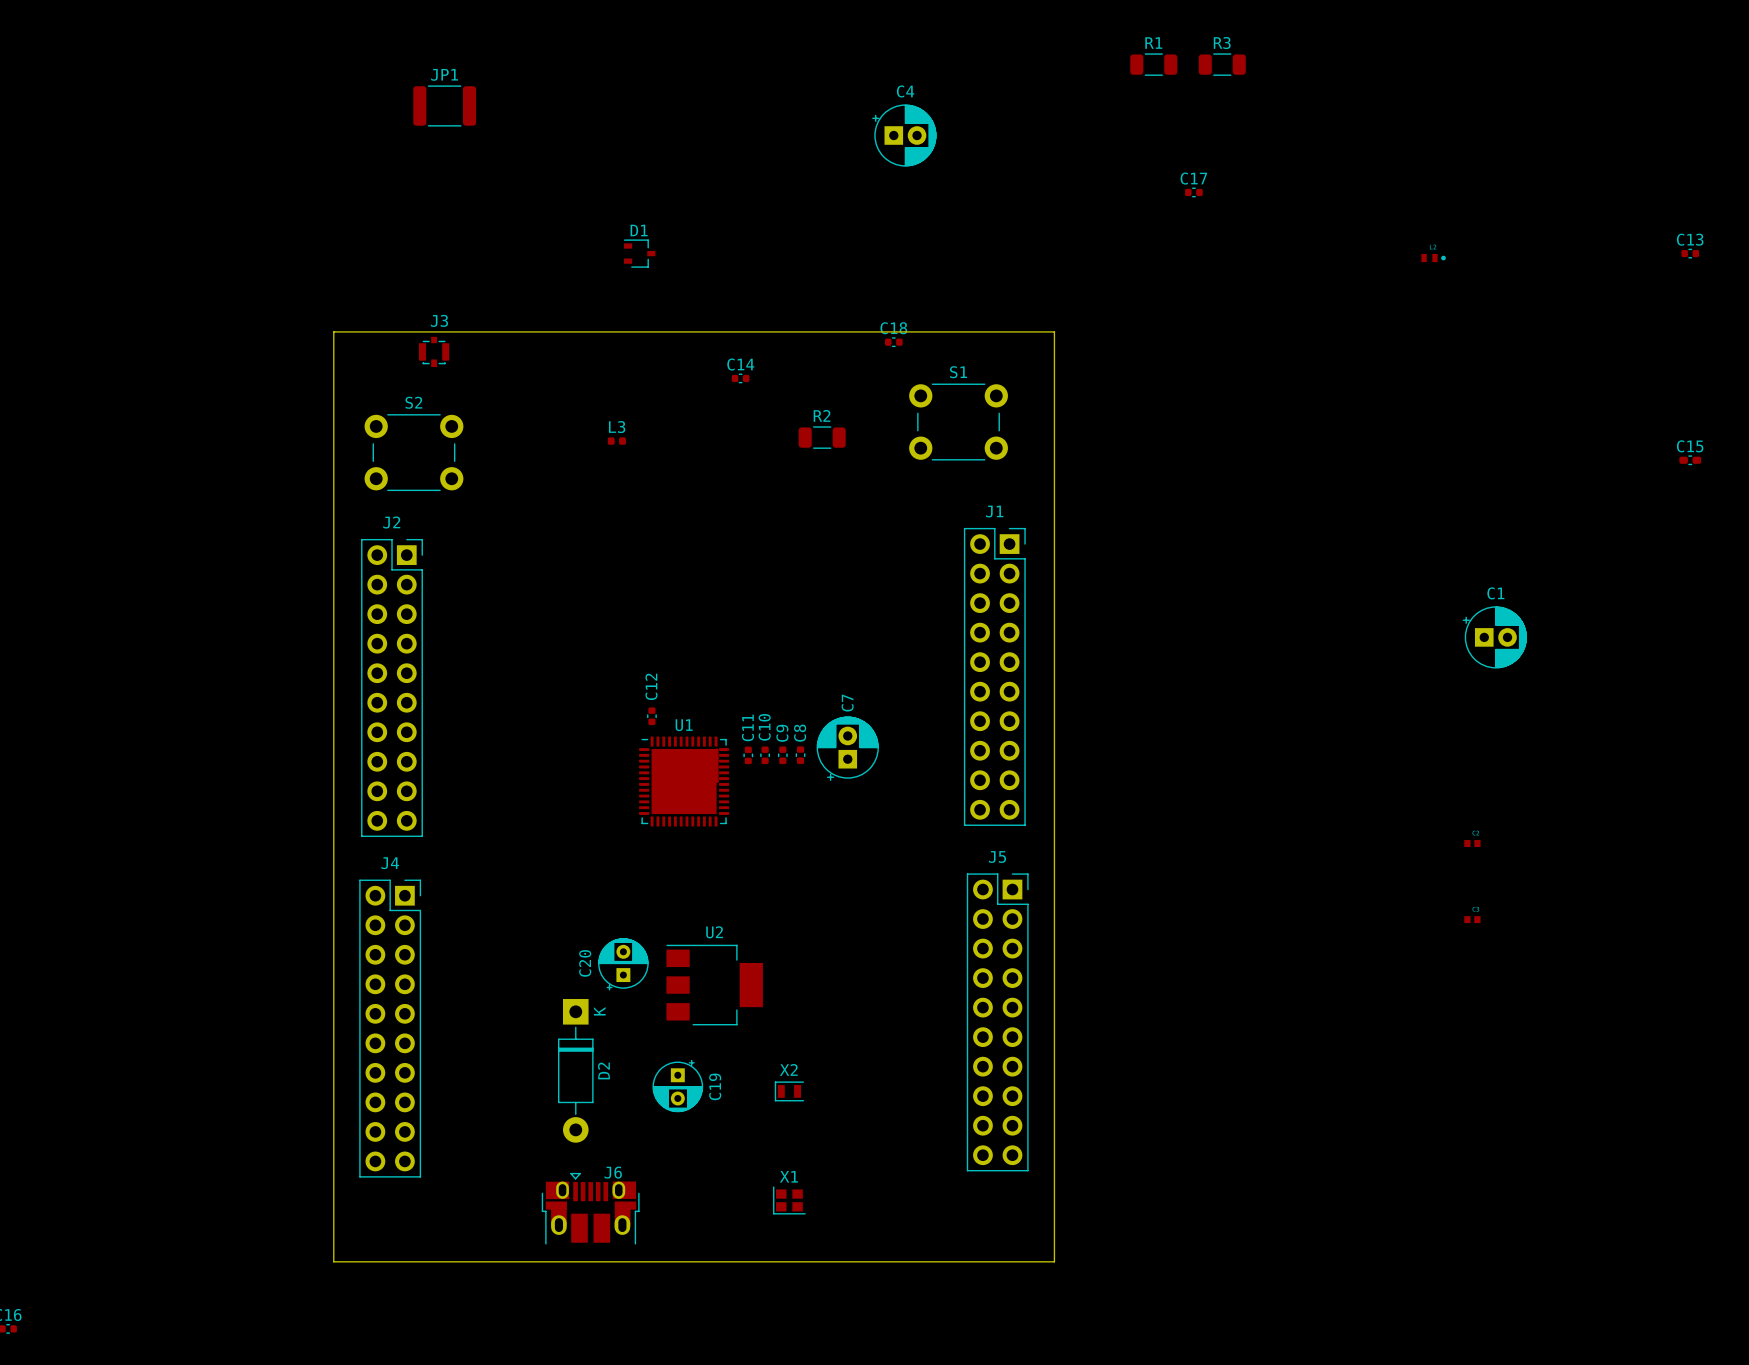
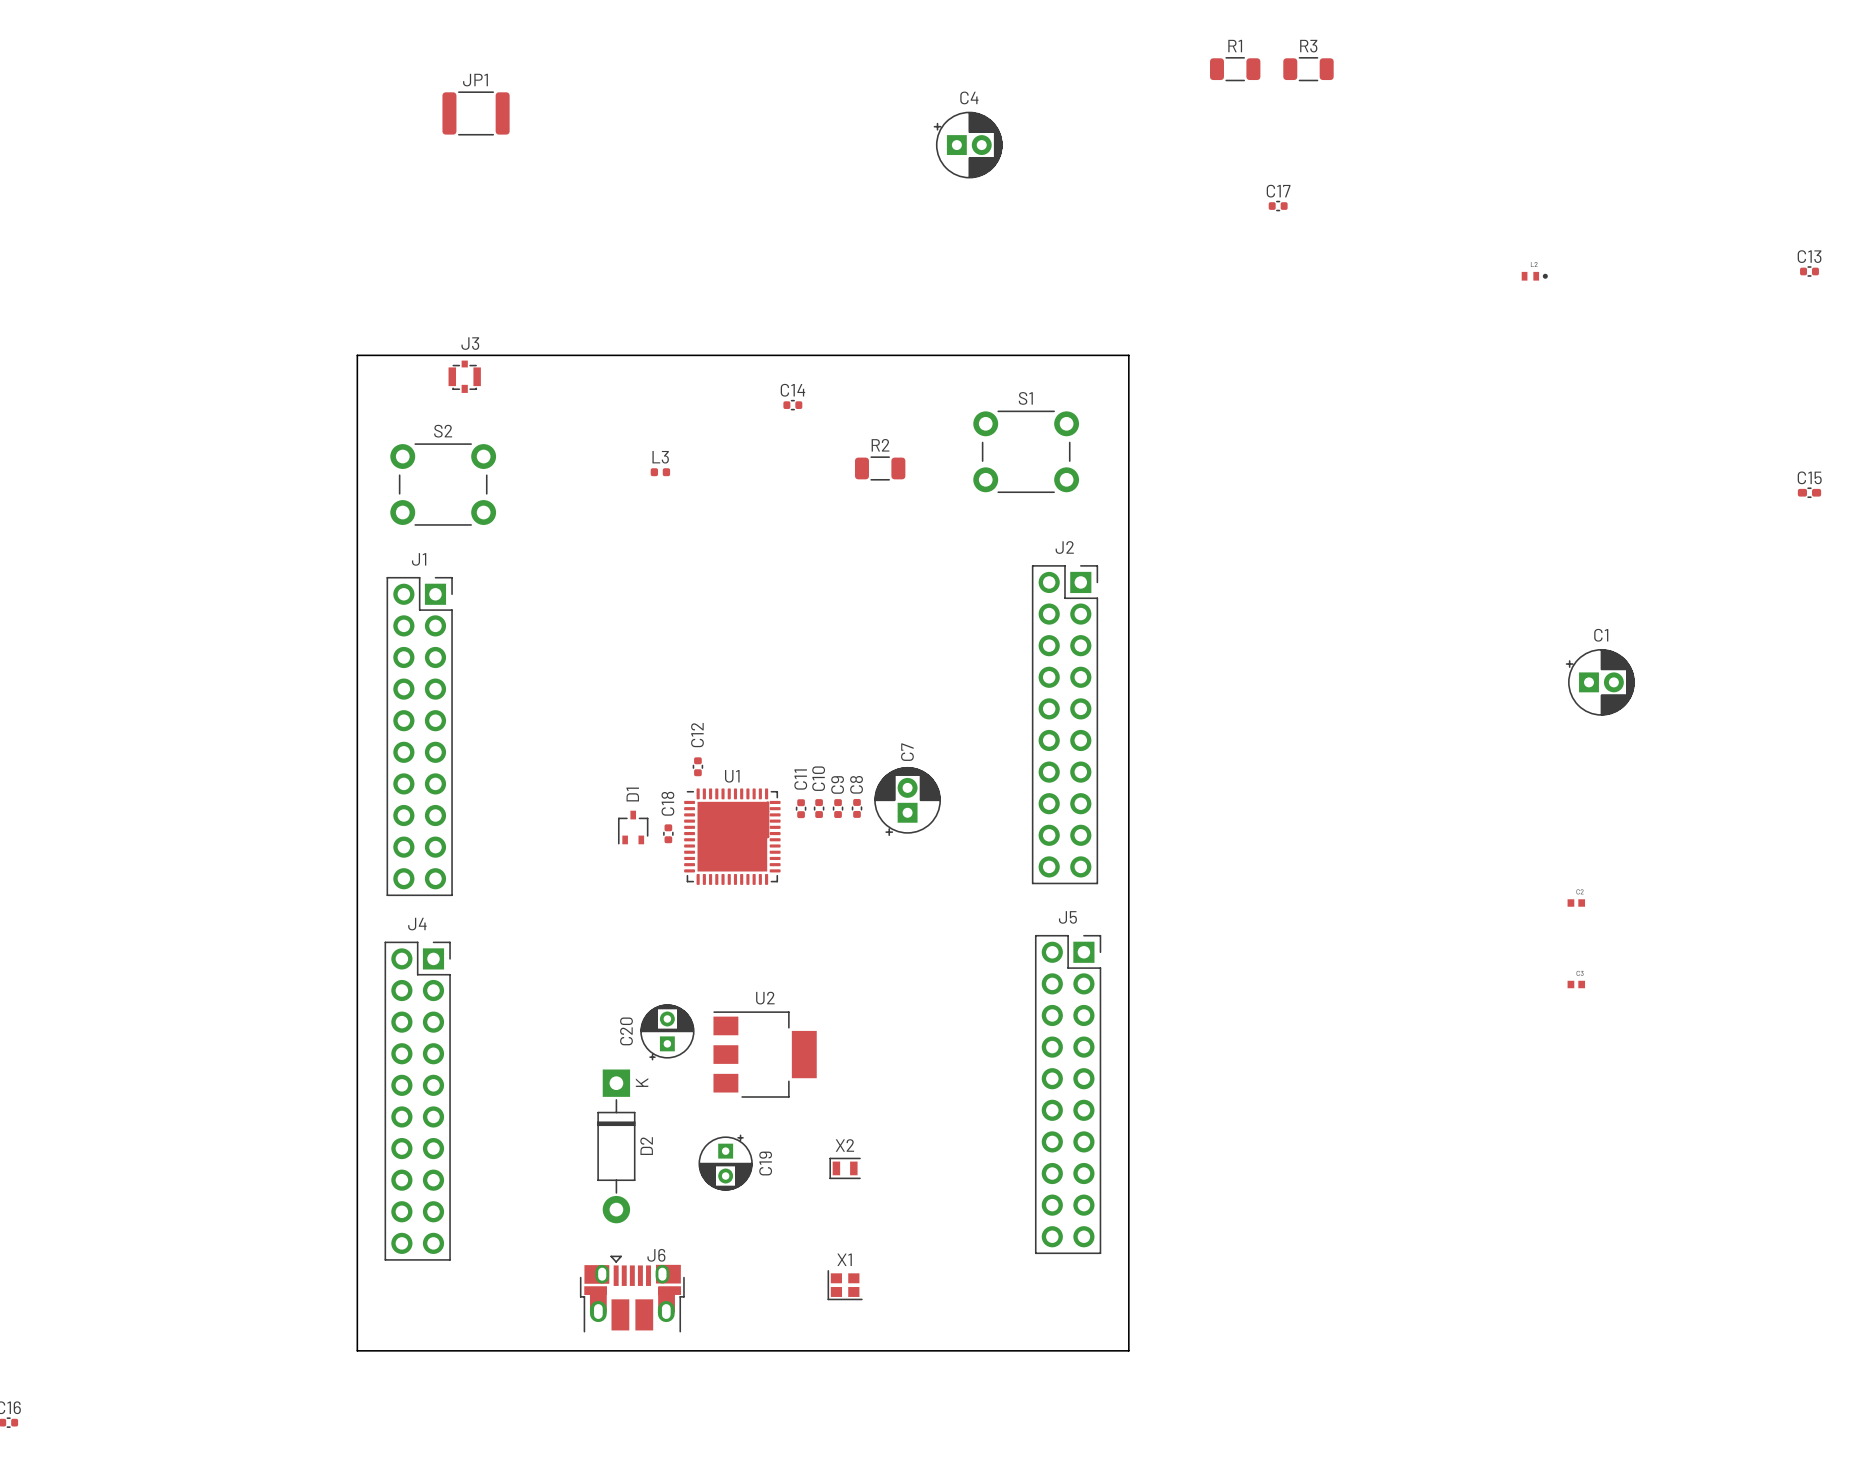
D1 rotation: 0° (639, 253) -> 90° counterclockwise (633, 827)
D1 position: (639, 253) -> (633, 827)
C18 rotation: 0° (893, 342) -> 90° clockwise (668, 833)
C18 position: (893, 342) -> (668, 833)
J1 name: J1 (994, 511) -> J2 (1064, 547)
J2 name: J2 (391, 522) -> J1 (419, 559)

